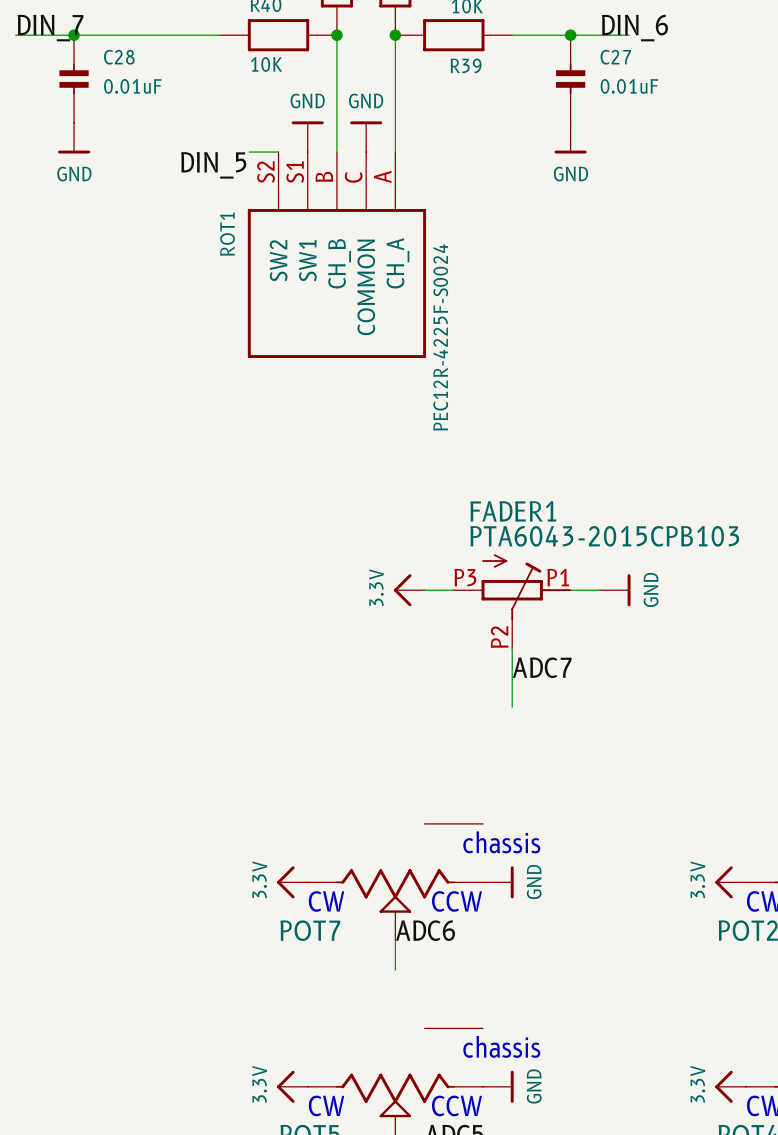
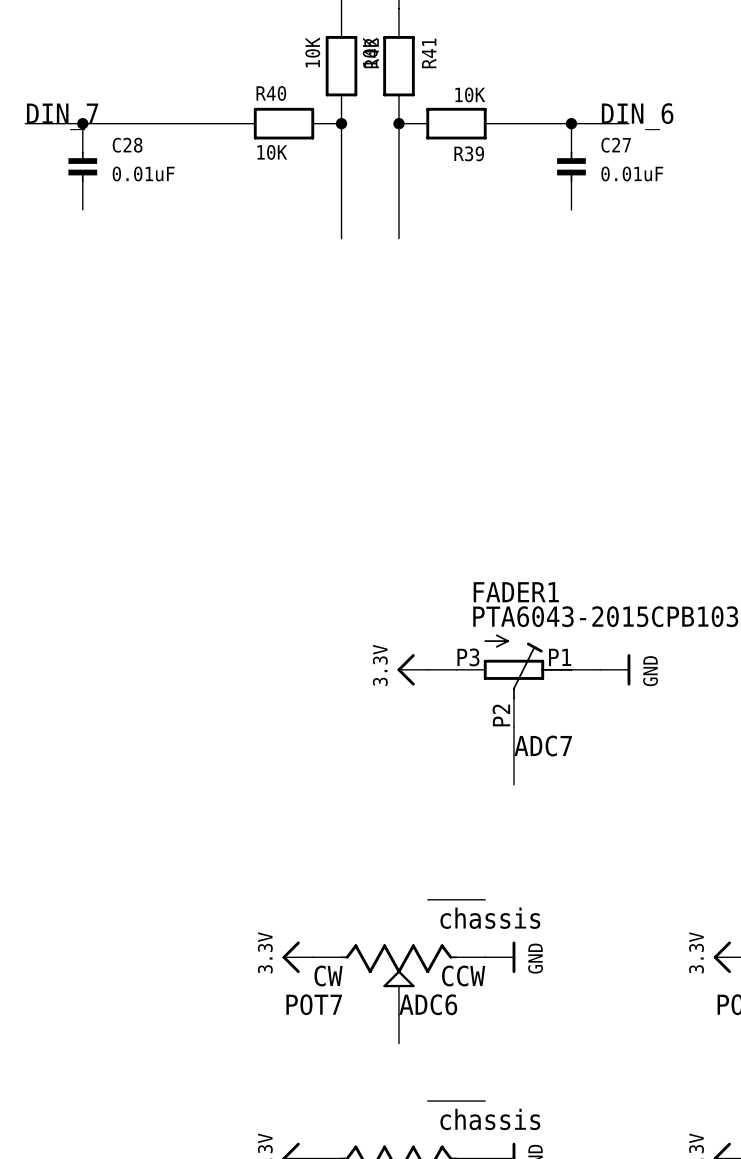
power symbol: GND (307, 136) -> none
power symbol: GND (366, 136) -> none
power symbol: GND (74, 138) -> none
power symbol: GND (570, 138) -> none
wire: (249, 152) (278, 152) -> none
label: DIN_5 (213, 165) -> none
ROT1: PEC12R-4225F-S0024 (336, 255) -> none

